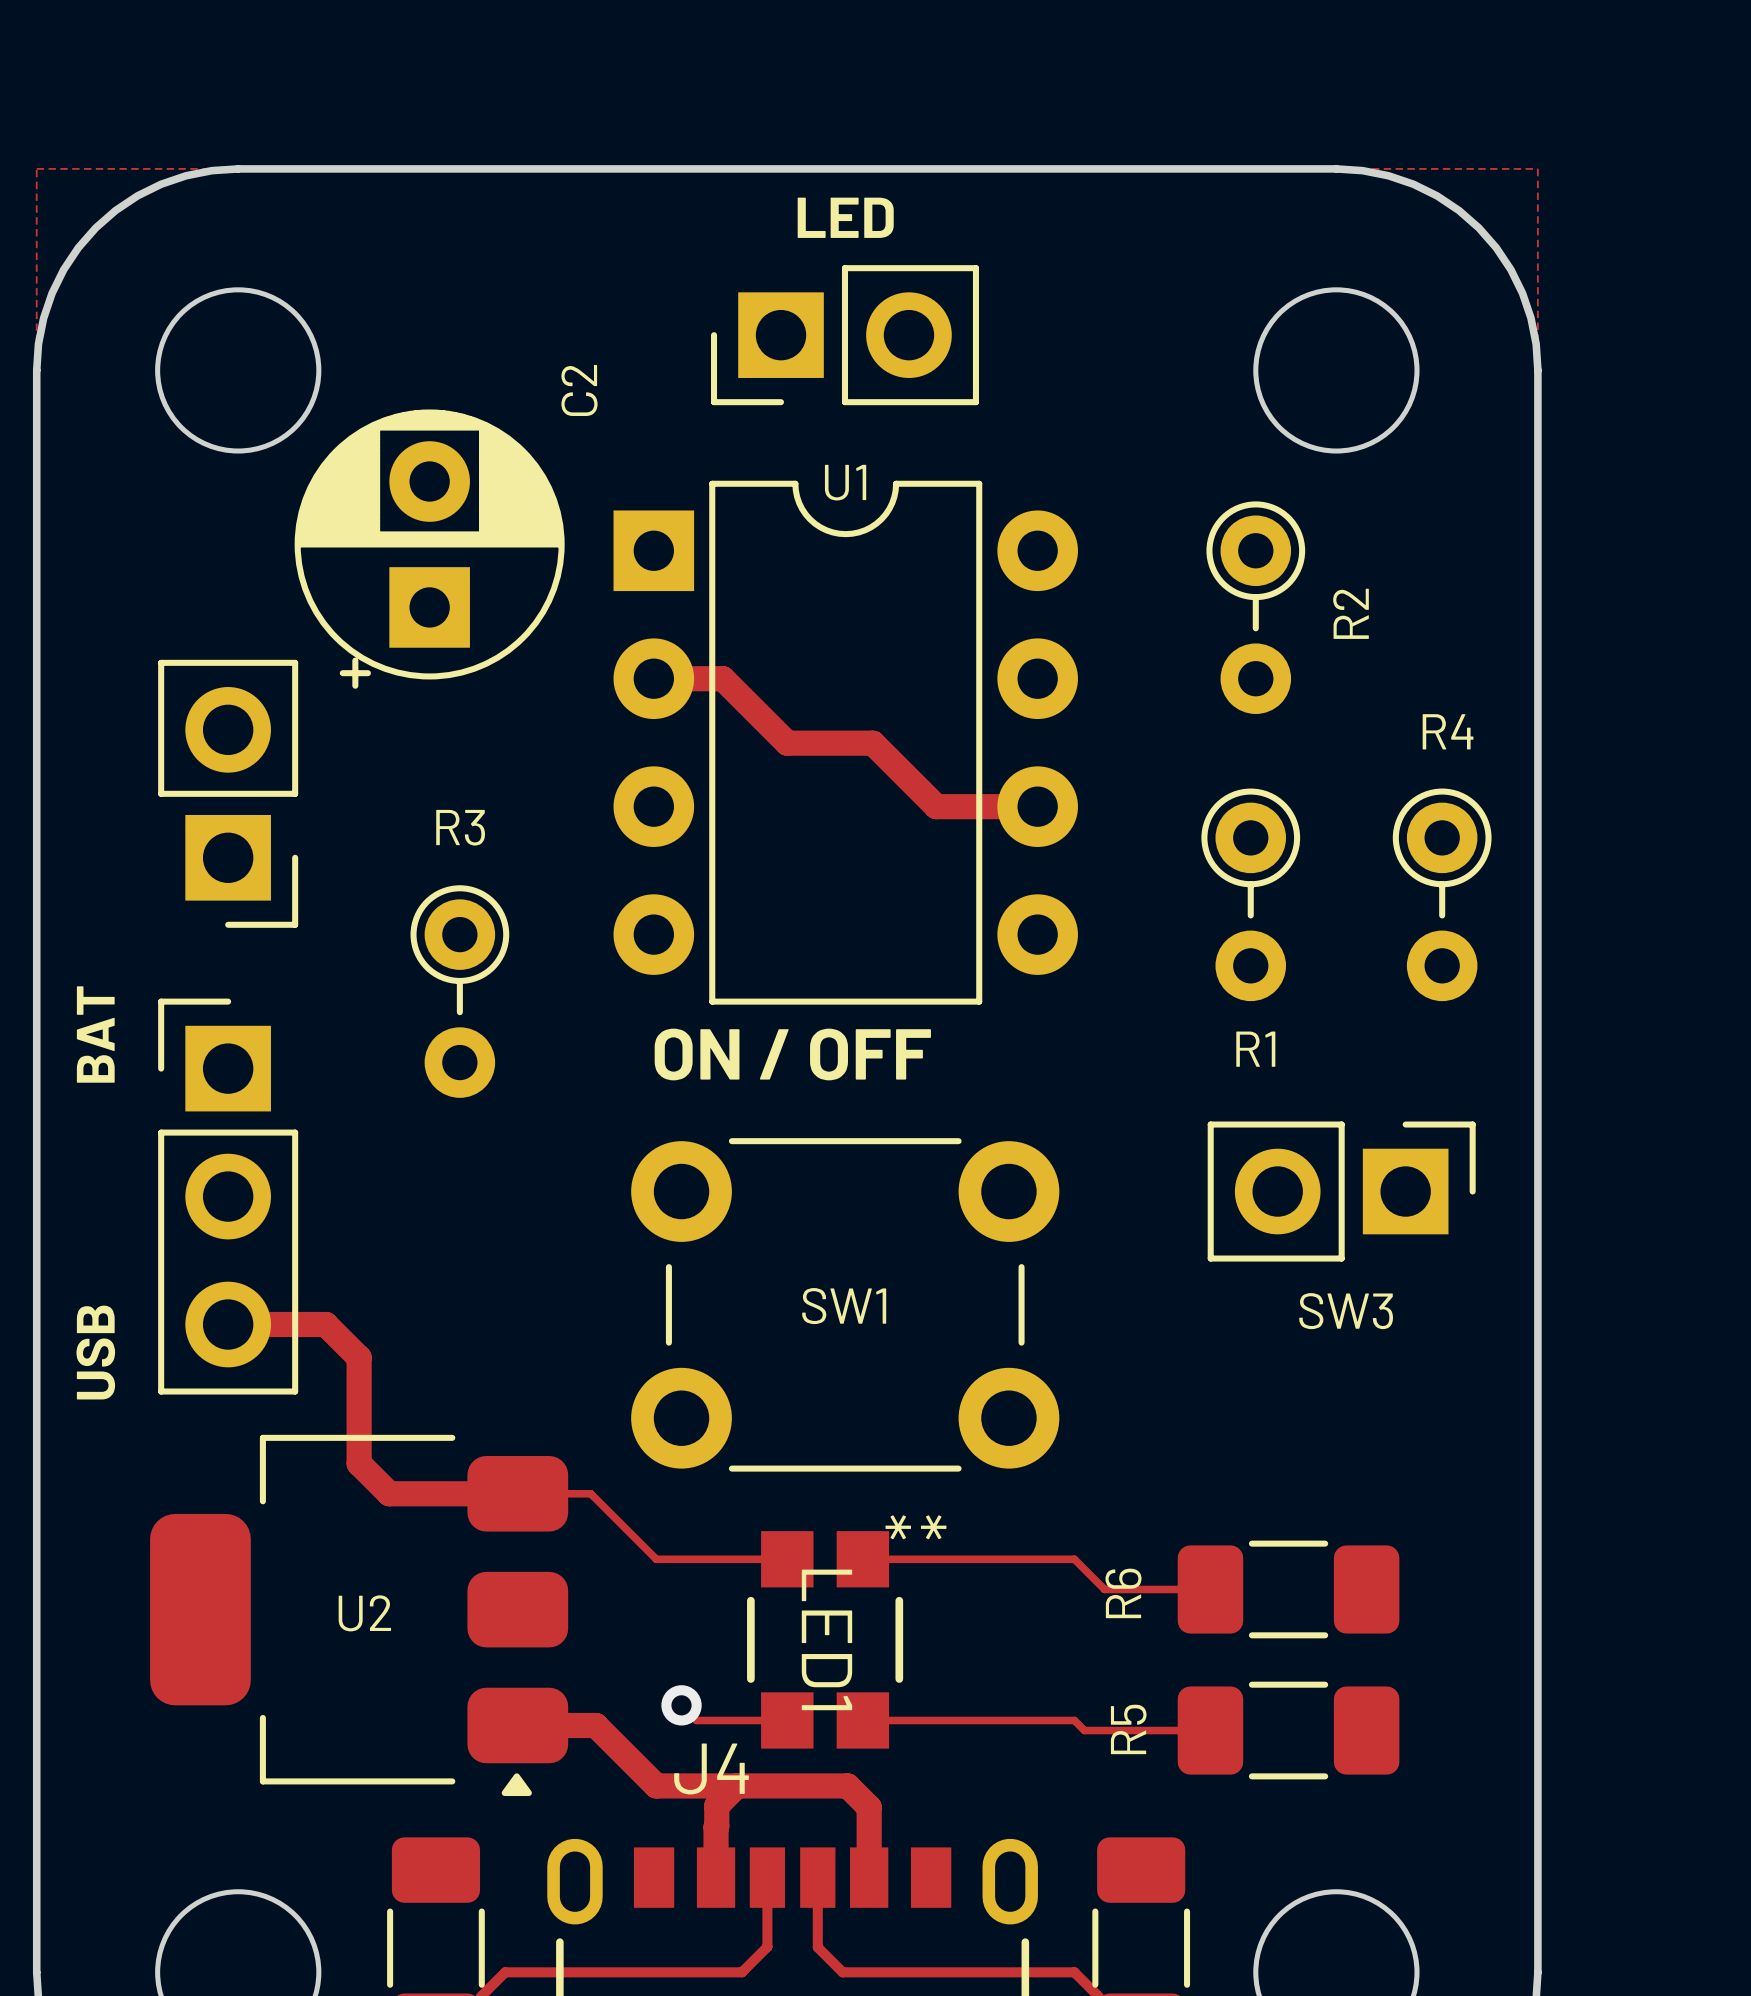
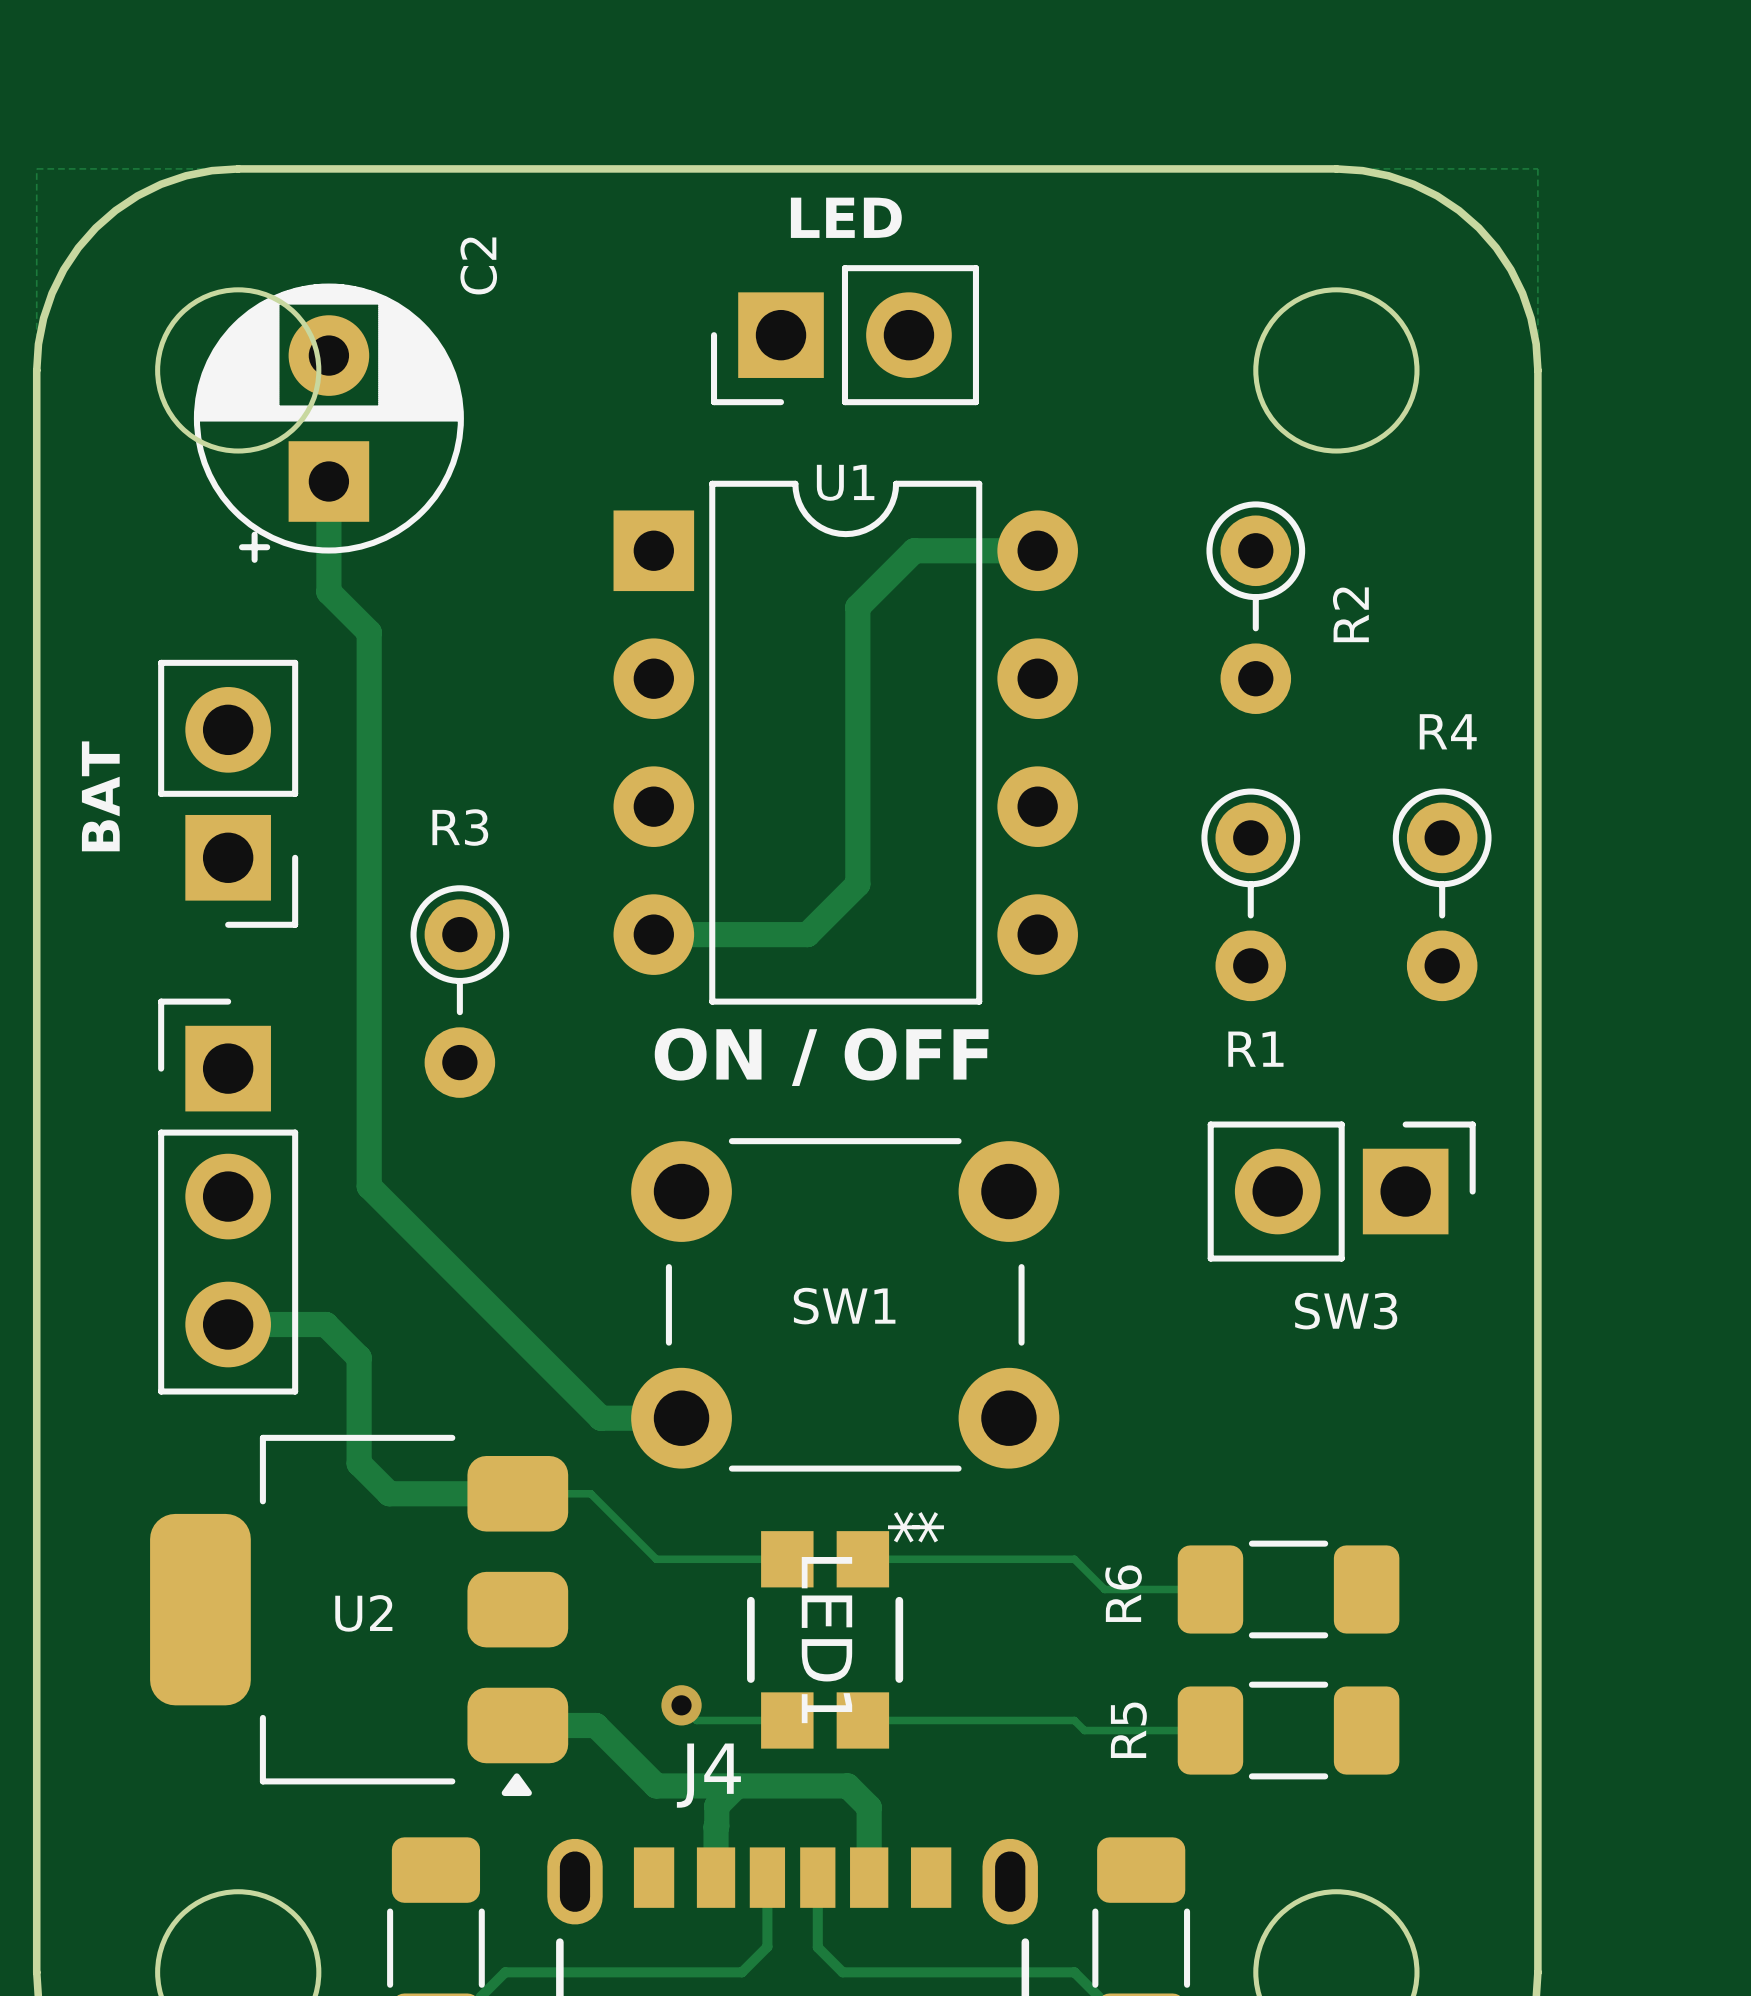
track: none -> (328, 481) (328, 592) (369, 632) (369, 1186) (600, 1418) (681, 1418)
C2 position: (429, 549) -> (328, 423)
track: none -> (1037, 550) (914, 550) (857, 607) (857, 884) (807, 934) (653, 934)
track: (653, 678) (722, 678) (787, 743) (872, 743) (936, 806) (1037, 806) -> none
text position: BAT (95, 1034) -> BAT (100, 796)
text: USB (95, 1352) -> none

